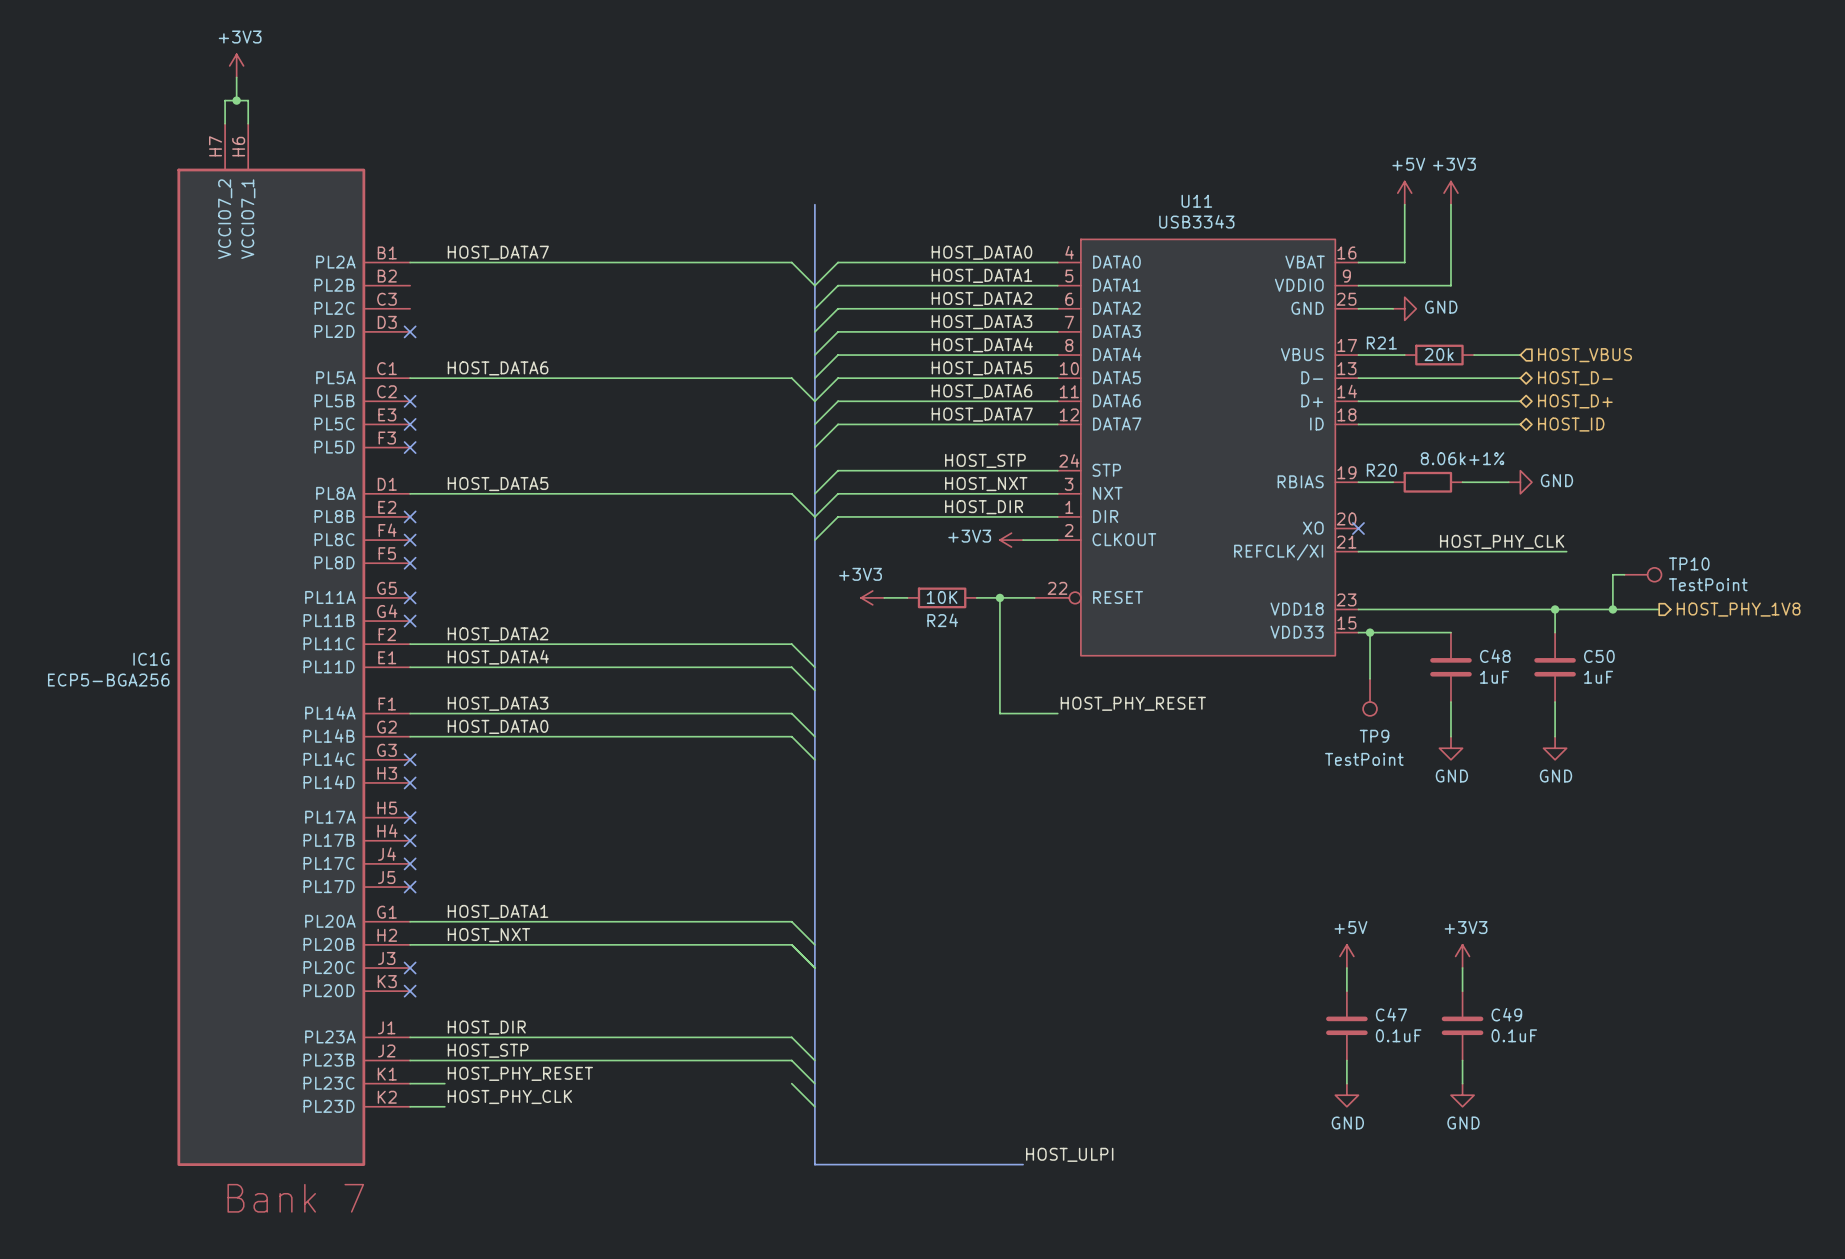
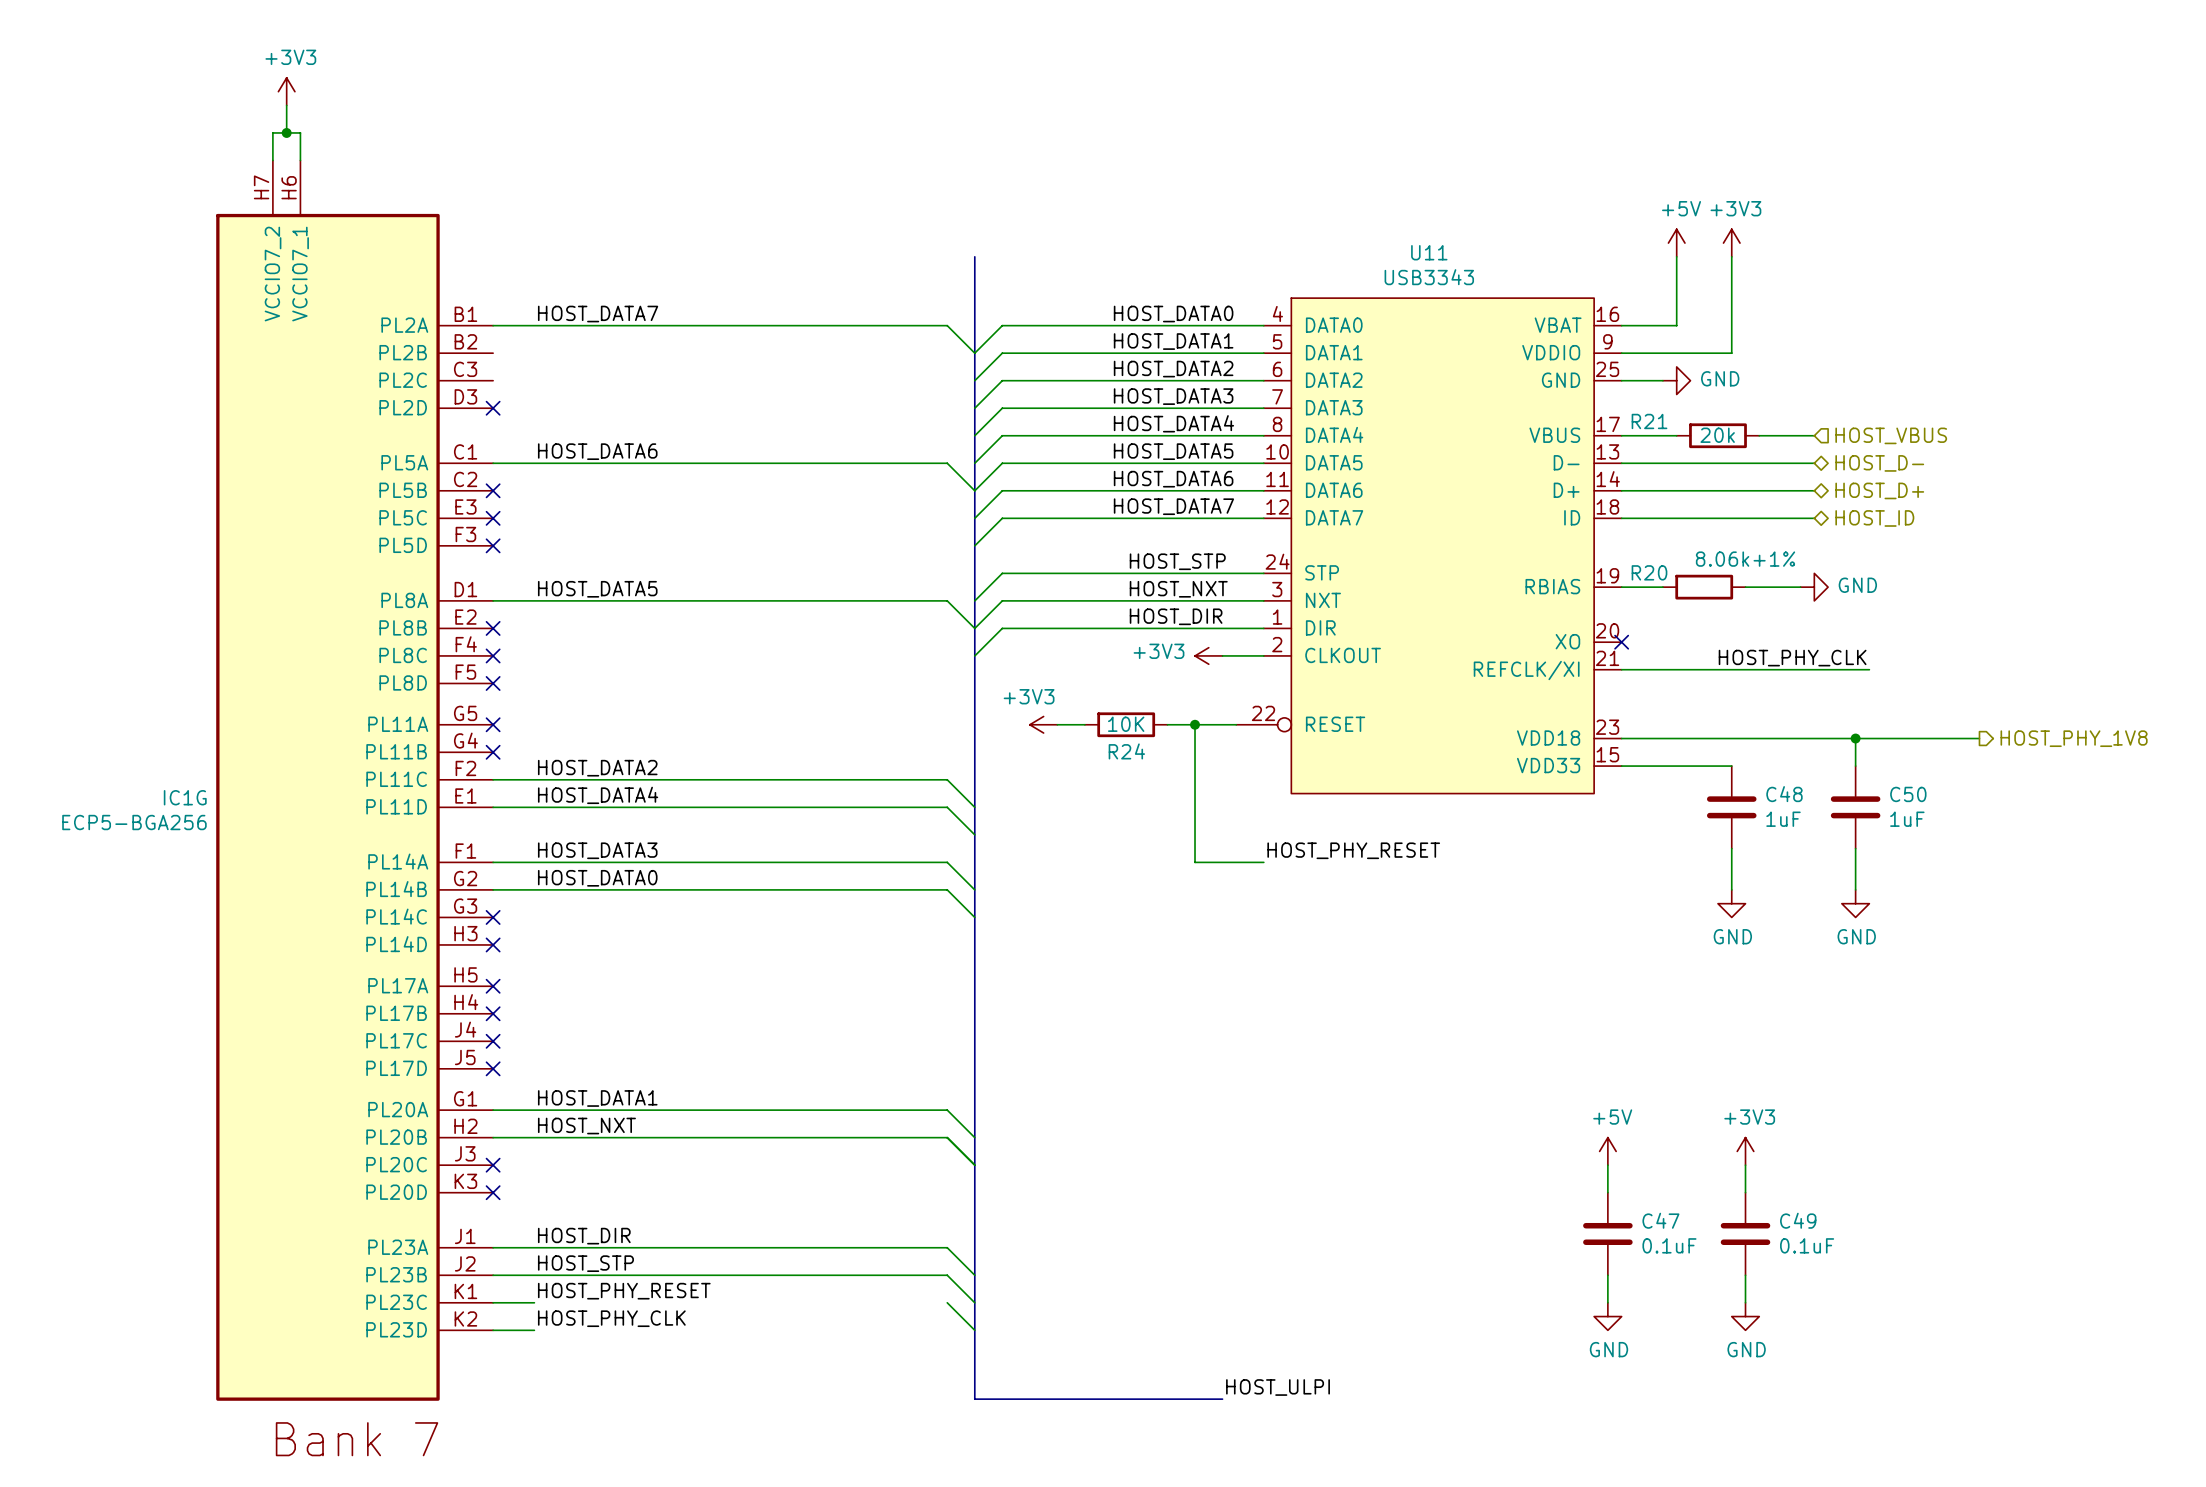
wire: (1624, 574) (1612, 574) (1612, 609) -> none
TP10: TestPoint (1642, 574) -> none
junction: (1612, 609) -> none
wire: (1370, 632) (1370, 678) -> none
junction: (1370, 632) -> none
TP9: TestPoint (1370, 697) -> none

